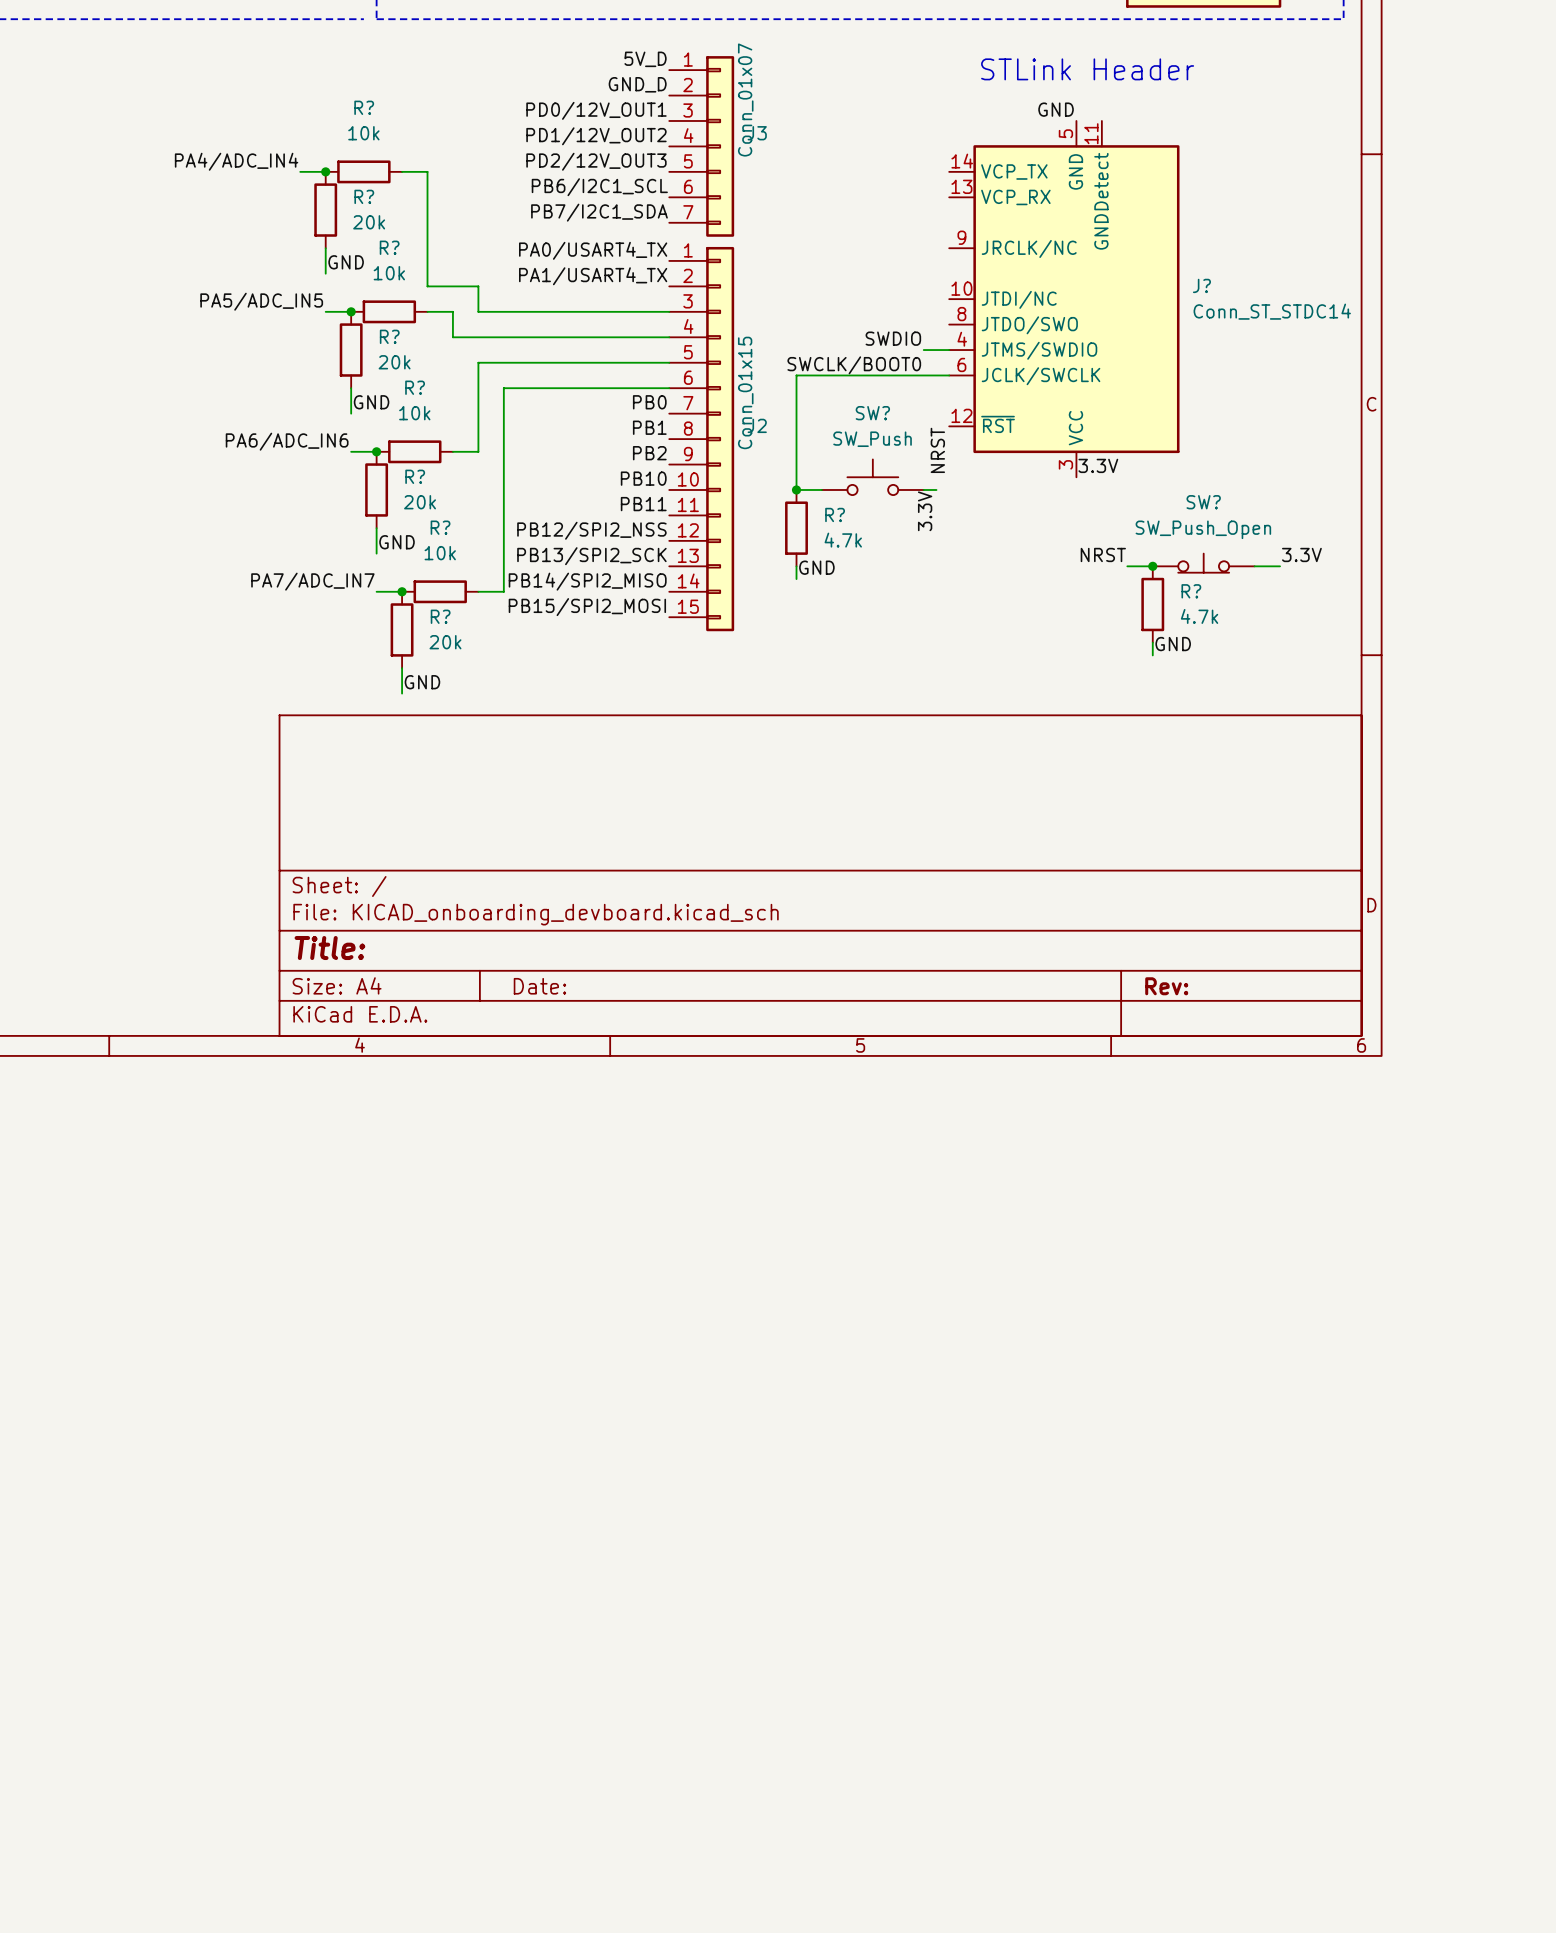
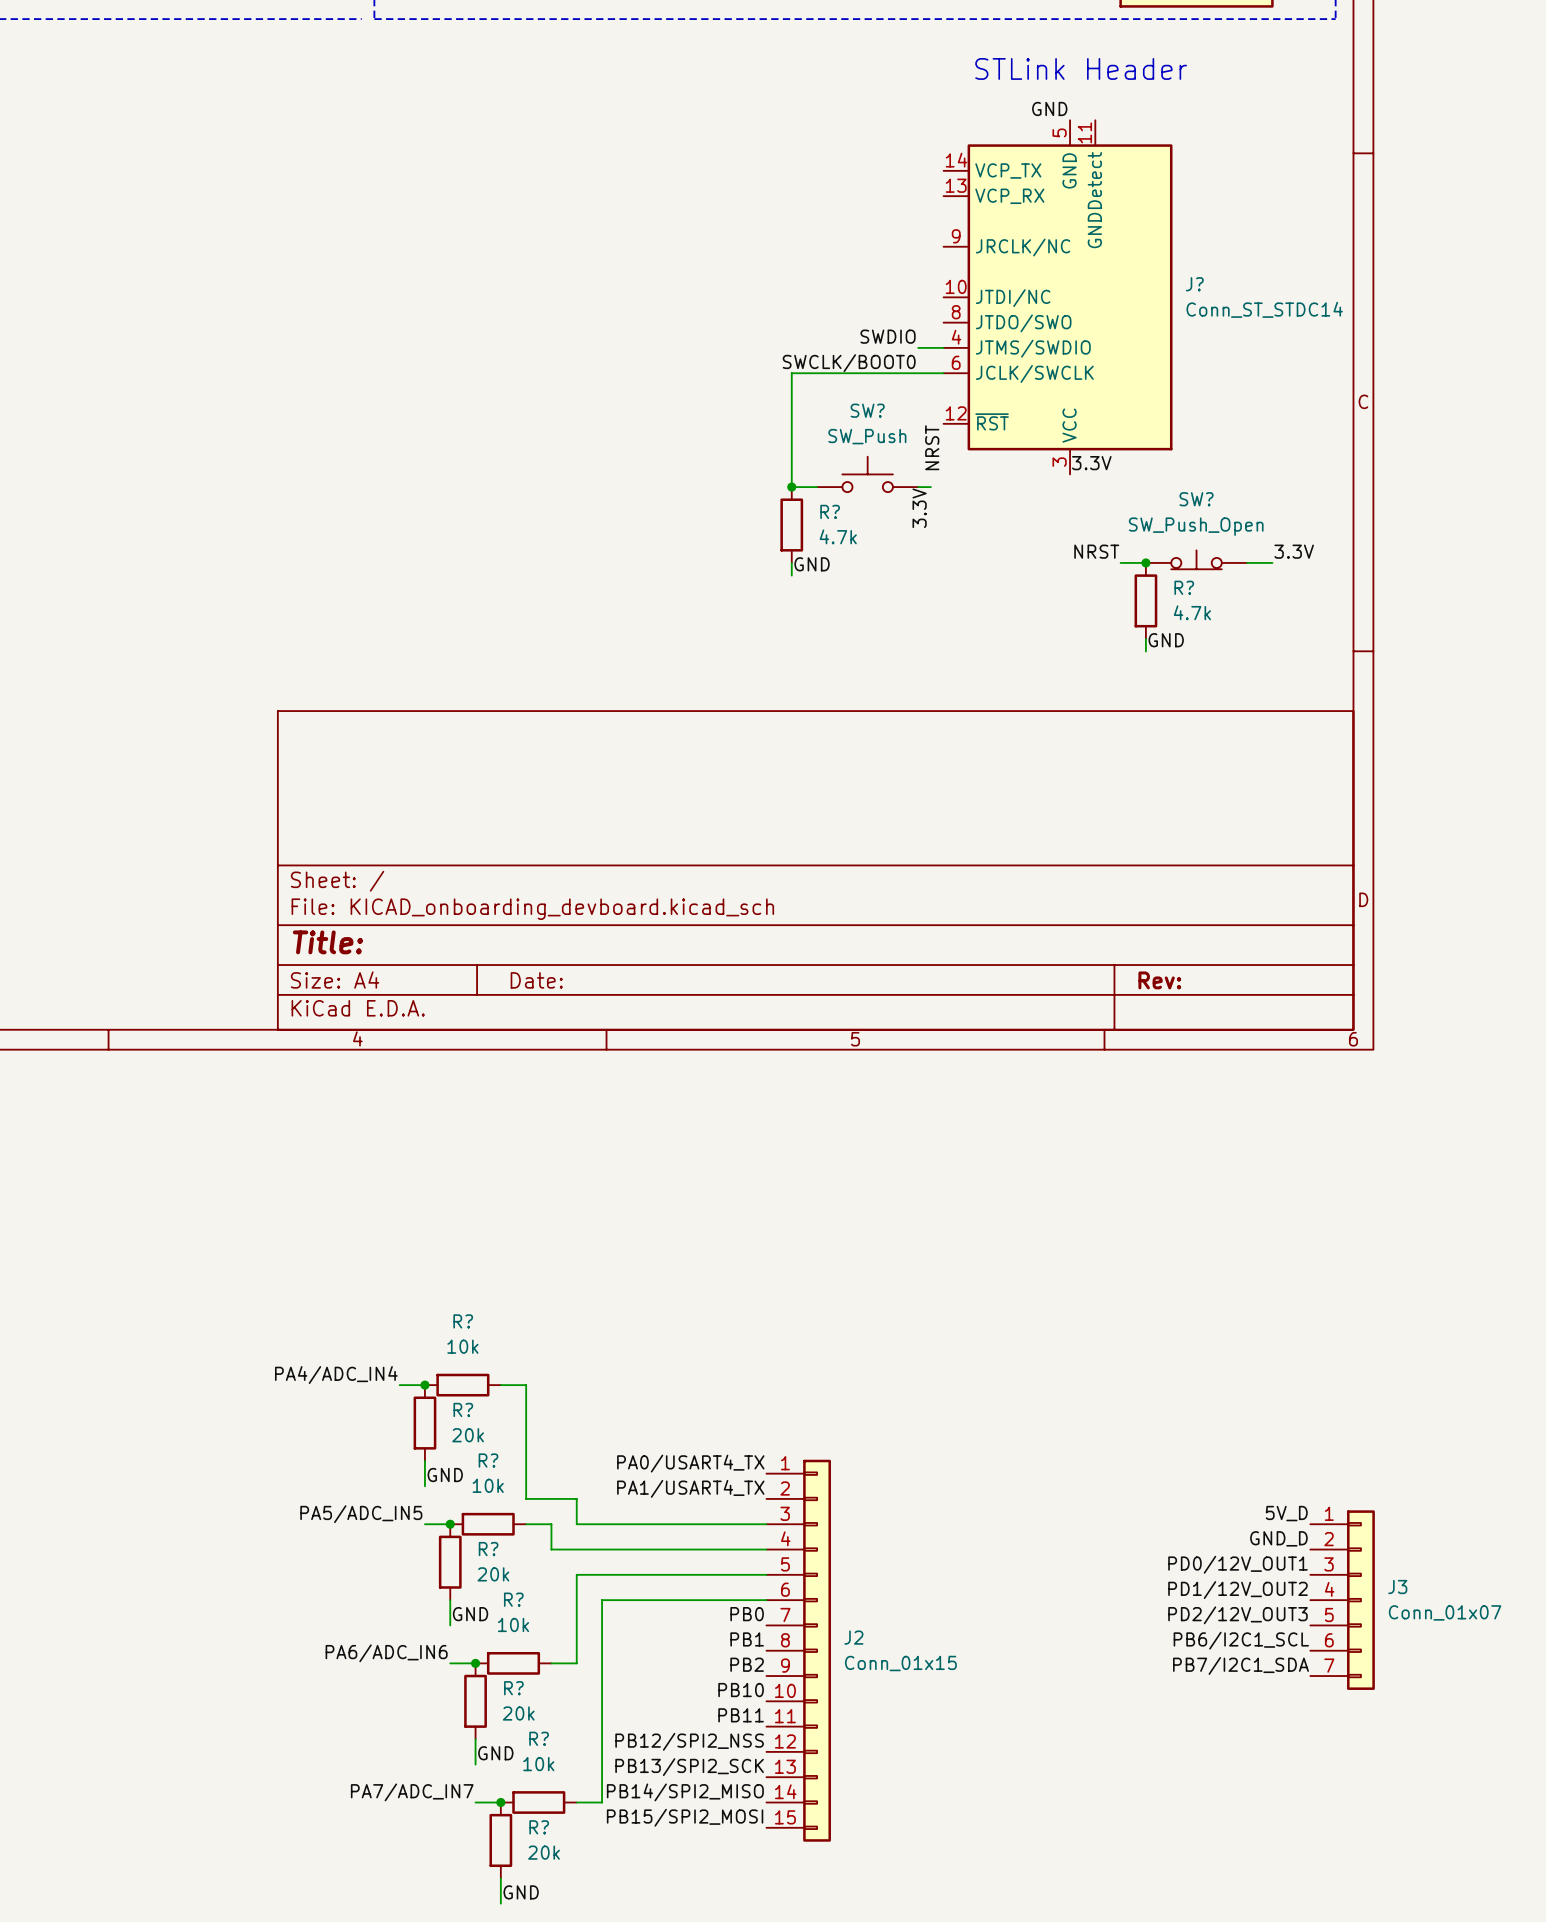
label: 5V_D (645, 59) -> none
label: GND_D (637, 84) -> none
J3 value rotation: 0° (745, 99) -> 90° clockwise (1445, 1612)
label: PD0/12V_OUT1 (596, 110) -> none
label: PD1/12V_OUT2 (596, 136) -> none
J3 position: (701, 146) -> (1342, 1600)
label: PA4/ADC_IN4 (236, 161) -> none
label: PD2/12V_OUT3 (596, 161) -> none
wire: (300, 171) (325, 171) -> none
junction: (325, 171) -> none
R?: 10k (363, 171) -> none
wire: (402, 171) (427, 171) (427, 286) (478, 286) (478, 311) (669, 311) -> none
label: PB6/I2C1_SCL (599, 187) -> none
R?: 20k (325, 210) -> none
label: PB7/I2C1_SDA (599, 212) -> none
wire: (325, 248) (325, 273) -> none
label: PA0/USART4_TX (593, 250) -> none
label: GND (346, 262) -> none
label: PA1/USART4_TX (593, 276) -> none
label: PA5/ADC_IN5 (261, 301) -> none
wire: (325, 311) (351, 311) -> none
junction: (351, 311) -> none
R?: 10k (389, 311) -> none
wire: (427, 311) (452, 311) (452, 337) (669, 337) -> none
R?: 20k (351, 350) -> none
wire: (669, 362) (478, 362) (478, 451) (452, 451) -> none
wire: (351, 388) (351, 413) -> none
wire: (669, 388) (503, 388) (503, 591) (478, 591) -> none
J2 value rotation: 0° (745, 392) -> 90° clockwise (900, 1663)
label: GND (371, 402) -> none
label: PB0 (649, 402) -> none
label: PB1 (649, 427) -> none
J2 position: (701, 439) -> (798, 1650)
label: PA6/ADC_IN6 (287, 441) -> none
wire: (351, 451) (376, 451) -> none
junction: (376, 451) -> none
R?: 10k (414, 451) -> none
label: PB2 (649, 453) -> none
label: PB10 (643, 478) -> none
R?: 20k (376, 489) -> none
label: PB11 (643, 504) -> none
wire: (376, 528) (376, 553) -> none
label: PB12/SPI2_NSS (591, 530) -> none
label: GND (397, 542) -> none
label: PB13/SPI2_SCK (591, 556) -> none
label: PA7/ADC_IN7 (312, 581) -> none
label: PB14/SPI2_MISO (587, 581) -> none
wire: (376, 591) (402, 591) -> none
junction: (402, 591) -> none
R?: 10k (440, 591) -> none
label: PB15/SPI2_MOSI (587, 607) -> none
R?: 20k (402, 629) -> none
wire: (402, 668) (402, 693) -> none
label: GND (422, 682) -> none
label: none -> PA4/ADC_IN4 (336, 1375)
wire: none -> (399, 1385) (424, 1385)
junction: none -> (424, 1385)
R?: none -> 10k (462, 1385)
wire: none -> (500, 1385) (526, 1385) (526, 1498) (576, 1498) (576, 1524) (766, 1524)
R?: none -> 20k (424, 1423)
wire: none -> (424, 1461) (424, 1486)
label: none -> PA0/USART4_TX (690, 1463)
label: none -> GND (445, 1475)
label: none -> PA1/USART4_TX (690, 1488)
label: none -> 5V_D (1286, 1513)
label: none -> PA5/ADC_IN5 (361, 1514)
wire: none -> (424, 1524) (450, 1524)
junction: none -> (450, 1524)
R?: none -> 10k (488, 1524)
wire: none -> (526, 1524) (551, 1524) (551, 1549) (766, 1549)
label: none -> GND_D (1278, 1538)
R?: none -> 20k (450, 1562)
label: none -> PD0/12V_OUT1 (1237, 1564)
wire: none -> (766, 1574) (576, 1574) (576, 1663) (551, 1663)
label: none -> PD1/12V_OUT2 (1237, 1590)
wire: none -> (450, 1600) (450, 1625)
wire: none -> (766, 1600) (602, 1600) (602, 1802) (576, 1802)
label: none -> GND (470, 1614)
label: none -> PB0 (747, 1614)
label: none -> PD2/12V_OUT3 (1237, 1615)
label: none -> PB1 (747, 1639)
label: none -> PB6/I2C1_SCL (1241, 1640)
label: none -> PA6/ADC_IN6 (386, 1653)
wire: none -> (450, 1663) (475, 1663)
junction: none -> (475, 1663)
R?: none -> 10k (513, 1663)
label: none -> PB2 (747, 1664)
label: none -> PB7/I2C1_SDA (1240, 1665)
label: none -> PB10 (741, 1690)
R?: none -> 20k (475, 1701)
label: none -> PB11 (741, 1715)
wire: none -> (475, 1739) (475, 1764)
label: none -> PB12/SPI2_NSS (689, 1741)
label: none -> GND (495, 1753)
label: none -> PB13/SPI2_SCK (689, 1767)
label: none -> PA7/ADC_IN7 (412, 1792)
label: none -> PB14/SPI2_MISO (685, 1792)
wire: none -> (475, 1802) (500, 1802)
junction: none -> (500, 1802)
R?: none -> 10k (538, 1802)
label: none -> PB15/SPI2_MOSI (685, 1817)
R?: none -> 20k (500, 1840)
wire: none -> (500, 1878) (500, 1903)
label: none -> GND (521, 1892)

